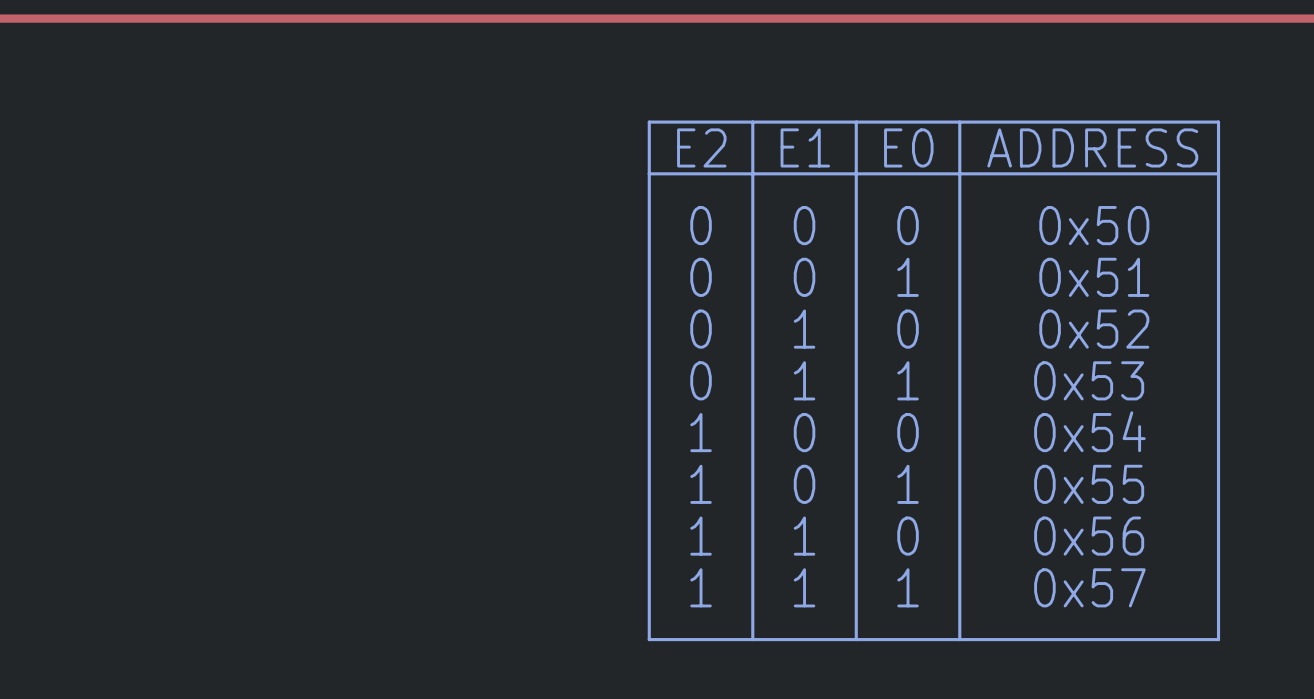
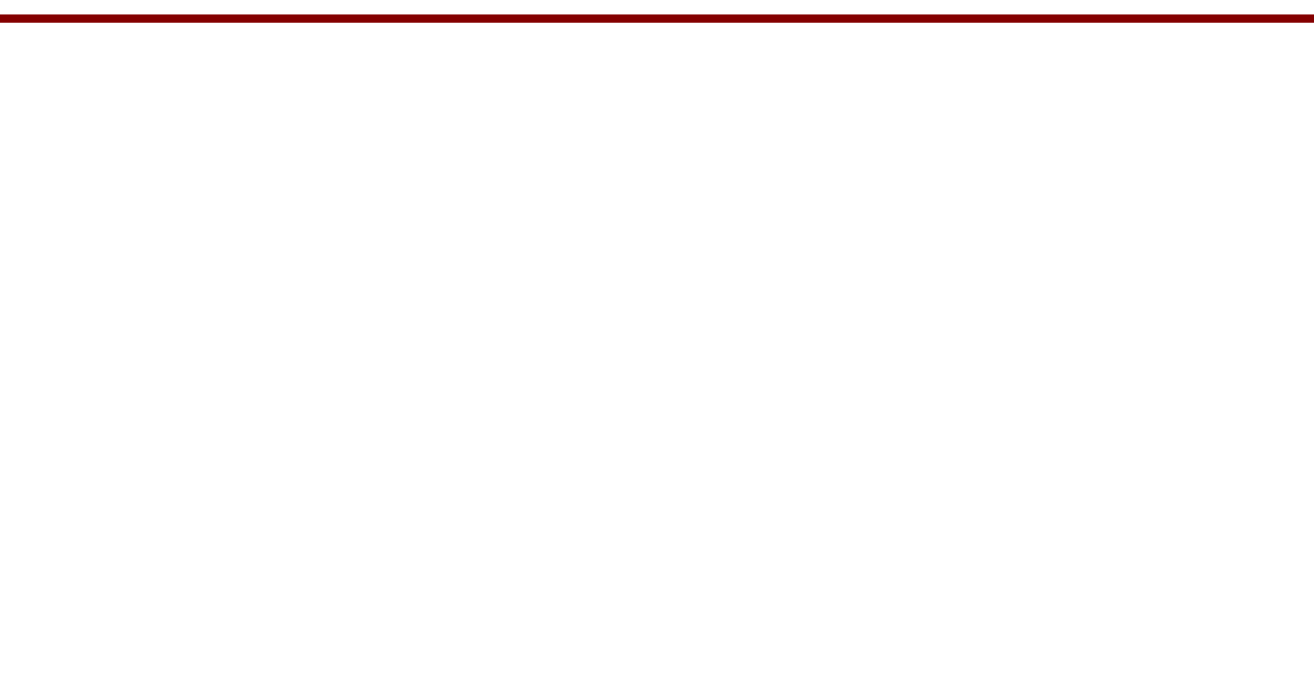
line: (649, 122) (649, 639) (1218, 639) (1218, 122) (649, 122) -> none
line: (752, 122) (752, 639) -> none
line: (856, 122) (856, 639) -> none
line: (959, 122) (959, 639) -> none
text: E2 (701, 147) -> none
text: E1 (805, 147) -> none
text: E0 (908, 147) -> none
text: ADDRESS (1092, 147) -> none
line: (649, 173) (1218, 173) -> none
text: 0 (701, 225) -> none
text: 0 (804, 225) -> none
text: 0 (908, 225) -> none
text: 0x50 (1094, 225) -> none
text: 0 (701, 277) -> none
text: 0 (804, 277) -> none
text: 1 (908, 277) -> none
text: 0x51 (1094, 277) -> none
text: 0 (701, 329) -> none
text: 1 (804, 329) -> none
text: 0 (908, 329) -> none
text: 0x52 (1094, 329) -> none
text: 0 (701, 380) -> none
text: 1 (804, 380) -> none
text: 1 (908, 380) -> none
text: 0x53 (1089, 380) -> none
text: 0x54 (1089, 431) -> none
text: 1 (701, 432) -> none
text: 0 (804, 432) -> none
text: 0 (908, 432) -> none
text: 1 (701, 484) -> none
text: 0 (804, 484) -> none
text: 1 (908, 484) -> none
text: 0x55 (1089, 484) -> none
text: 1 (701, 536) -> none
text: 1 (804, 536) -> none
text: 0 (908, 536) -> none
text: 0x56 (1089, 536) -> none
text: 1 (701, 587) -> none
text: 1 (804, 587) -> none
text: 1 (908, 587) -> none
text: 0x57 (1089, 587) -> none

